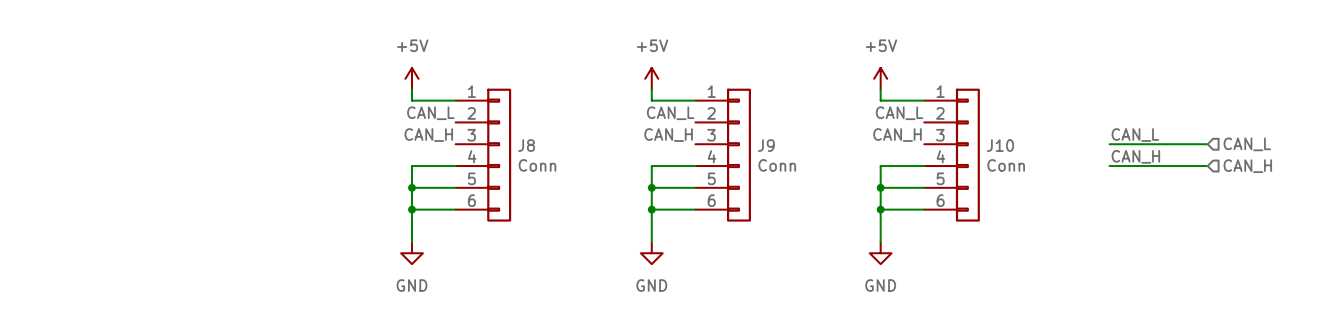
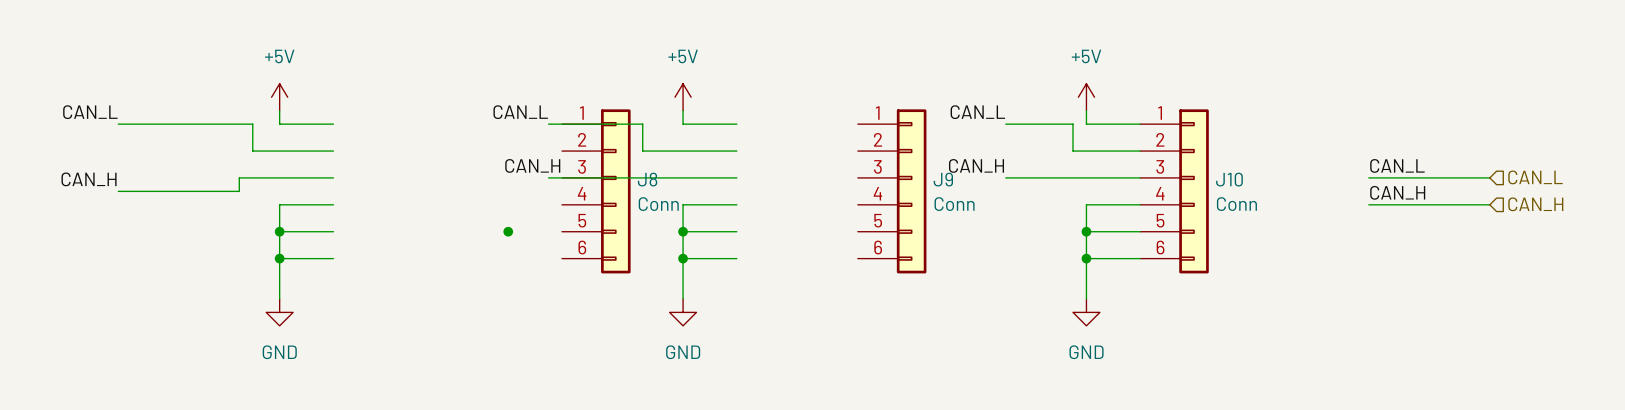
power symbol: none -> +5V (279, 97)
power symbol: +5V (411, 78) -> none
power symbol: none -> +5V (683, 97)
power symbol: +5V (651, 78) -> none
wire: none -> (279, 110) (279, 124) (333, 124)
wire: (411, 89) (411, 100) (444, 100) -> none
wire: (651, 89) (651, 100) (695, 100) -> (683, 110) (683, 124) (736, 124)
label: none -> CAN_L (90, 112)
label: none -> CAN_L (977, 112)
wire: none -> (118, 124) (252, 124) (252, 151) (333, 151)
wire: none -> (562, 124) (642, 124) (642, 151) (736, 151)
wire: none -> (1005, 124) (1073, 124) (1073, 151) (1140, 151)
label position: CAN_L (430, 113) -> CAN_L (520, 112)
label: CAN_L (670, 113) -> none
label: CAN_L (899, 113) -> none
label: CAN_H (668, 135) -> none
label: none -> CAN_H (976, 165)
label: CAN_H (897, 135) -> none
wire: none -> (333, 177) (239, 177) (239, 191) (118, 191)
wire: none -> (548, 177) (736, 177)
wire: none -> (1005, 177) (1140, 177)
label: none -> CAN_H (89, 179)
wire: (455, 166) (411, 166) (411, 242) -> (333, 204) (279, 204) (279, 298)
wire: (695, 166) (651, 166) (651, 242) -> (736, 204) (683, 204) (683, 298)
junction: none -> (279, 231)
wire: (411, 187) (455, 187) -> (279, 231) (333, 231)
junction: none -> (683, 231)
wire: (651, 187) (695, 187) -> (683, 231) (736, 231)
junction: (651, 187) -> none
junction: none -> (279, 258)
wire: (411, 209) (455, 209) -> (279, 258) (333, 258)
junction: (411, 209) -> none
junction: none -> (683, 258)
wire: (651, 209) (695, 209) -> (683, 258) (736, 258)
junction: (651, 209) -> none
power symbol: none -> GND (279, 312)
power symbol: GND (411, 253) -> none
power symbol: none -> GND (683, 312)
power symbol: GND (651, 253) -> none

